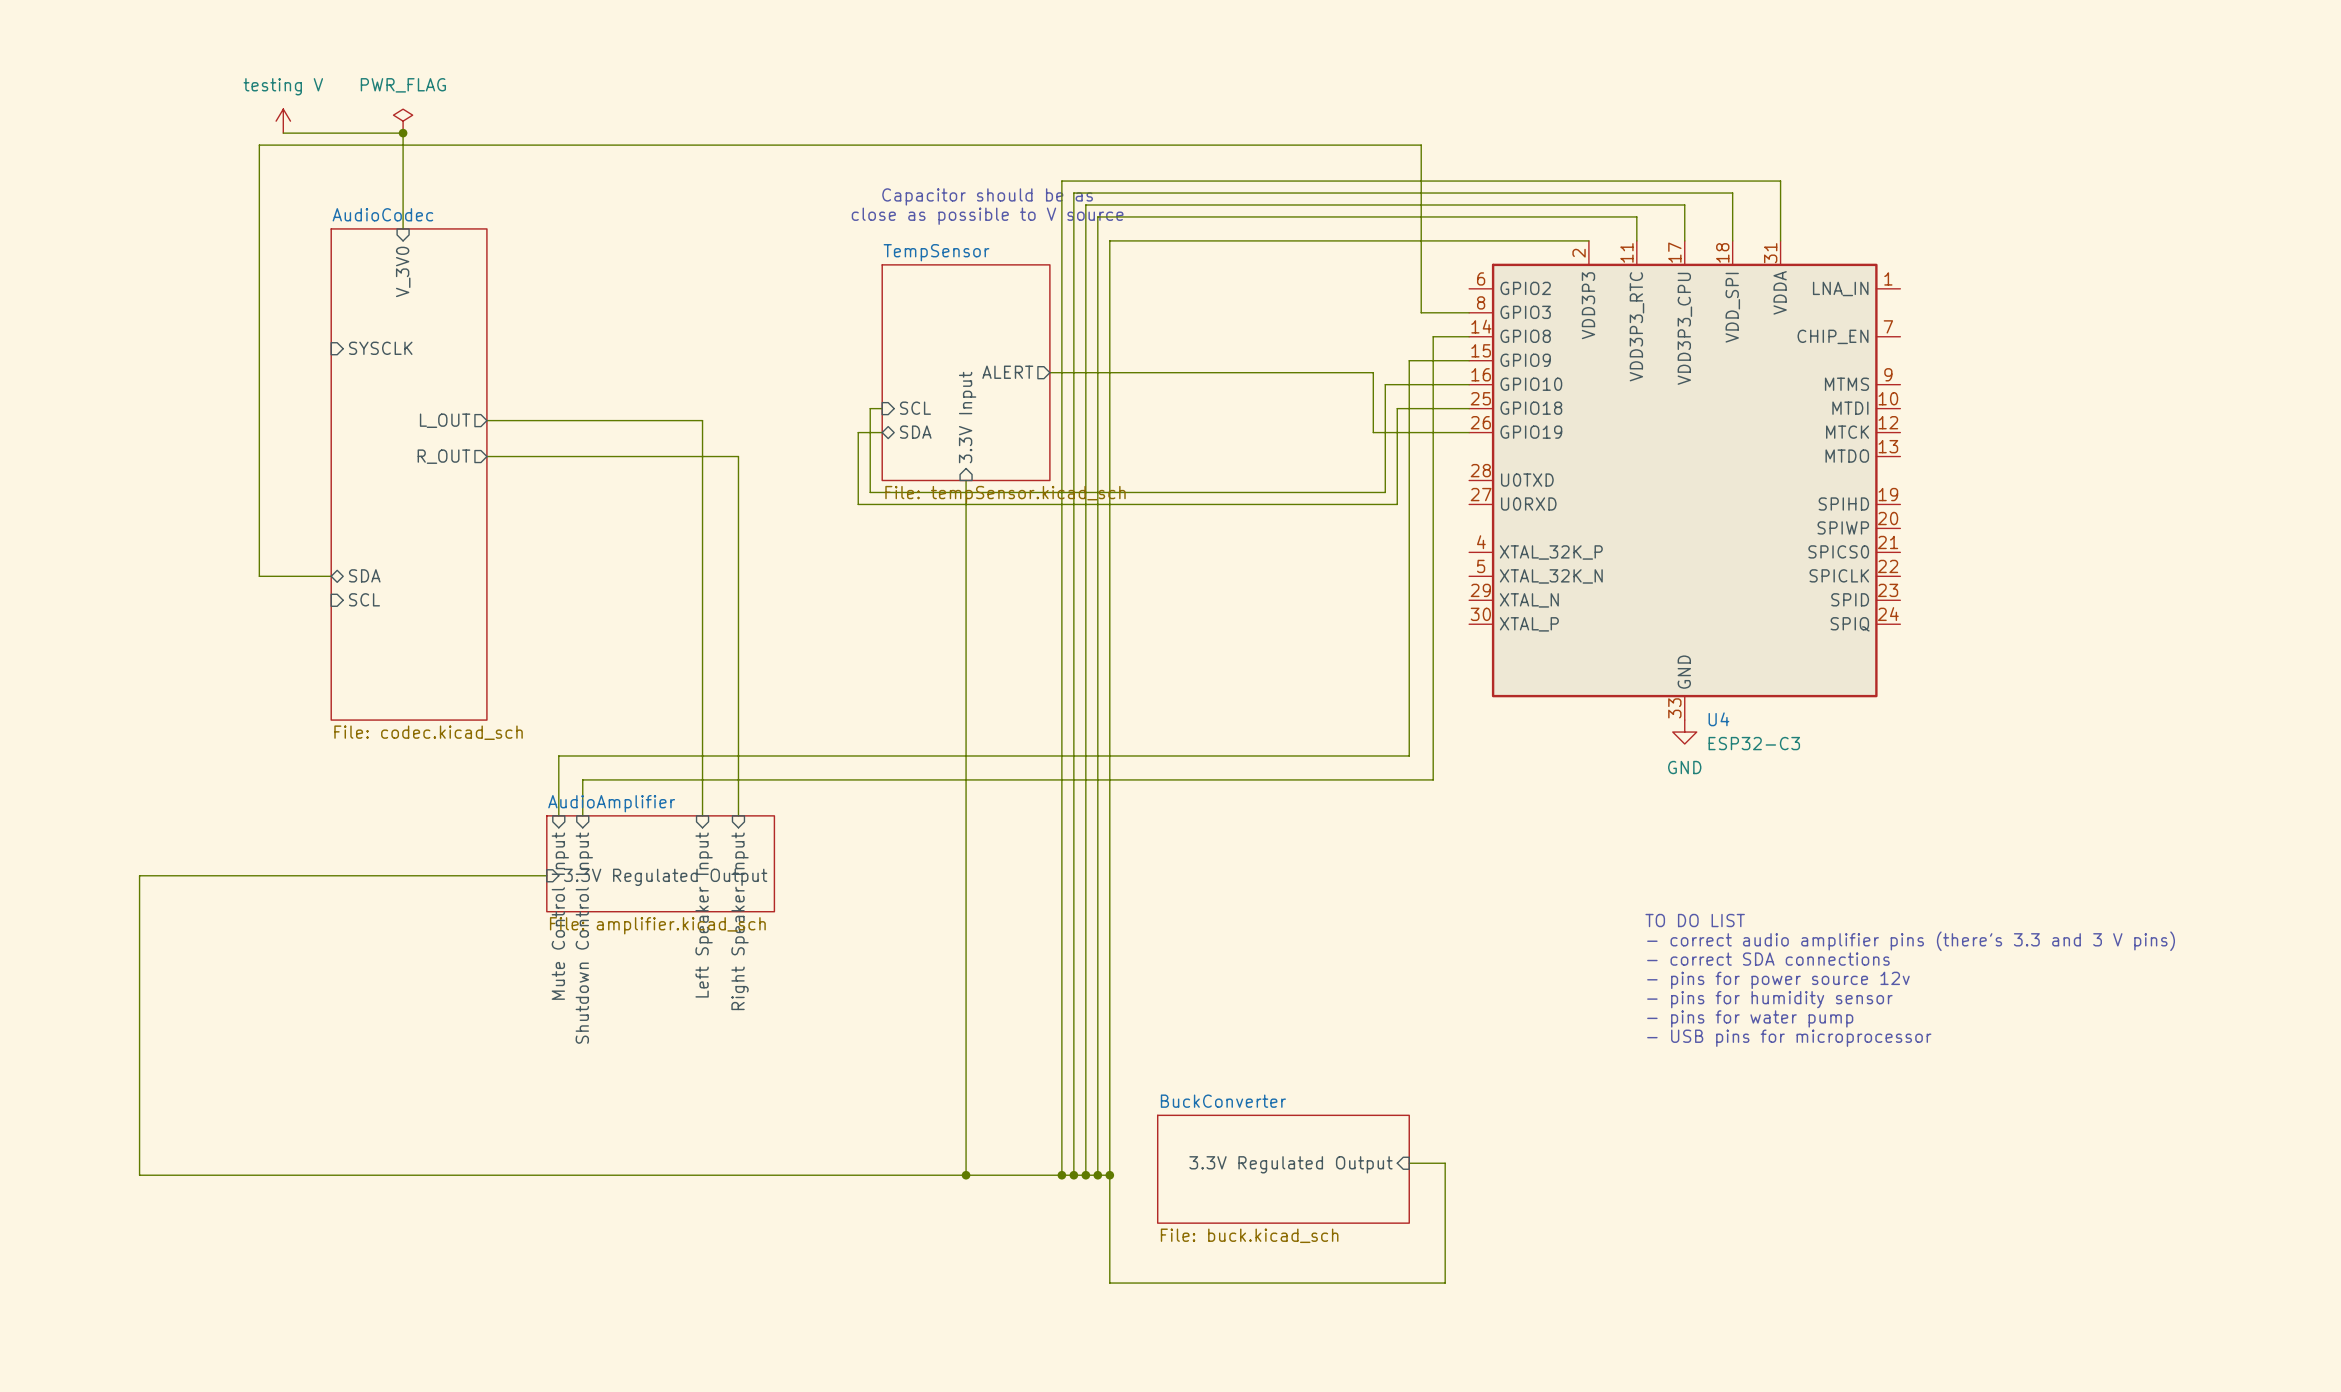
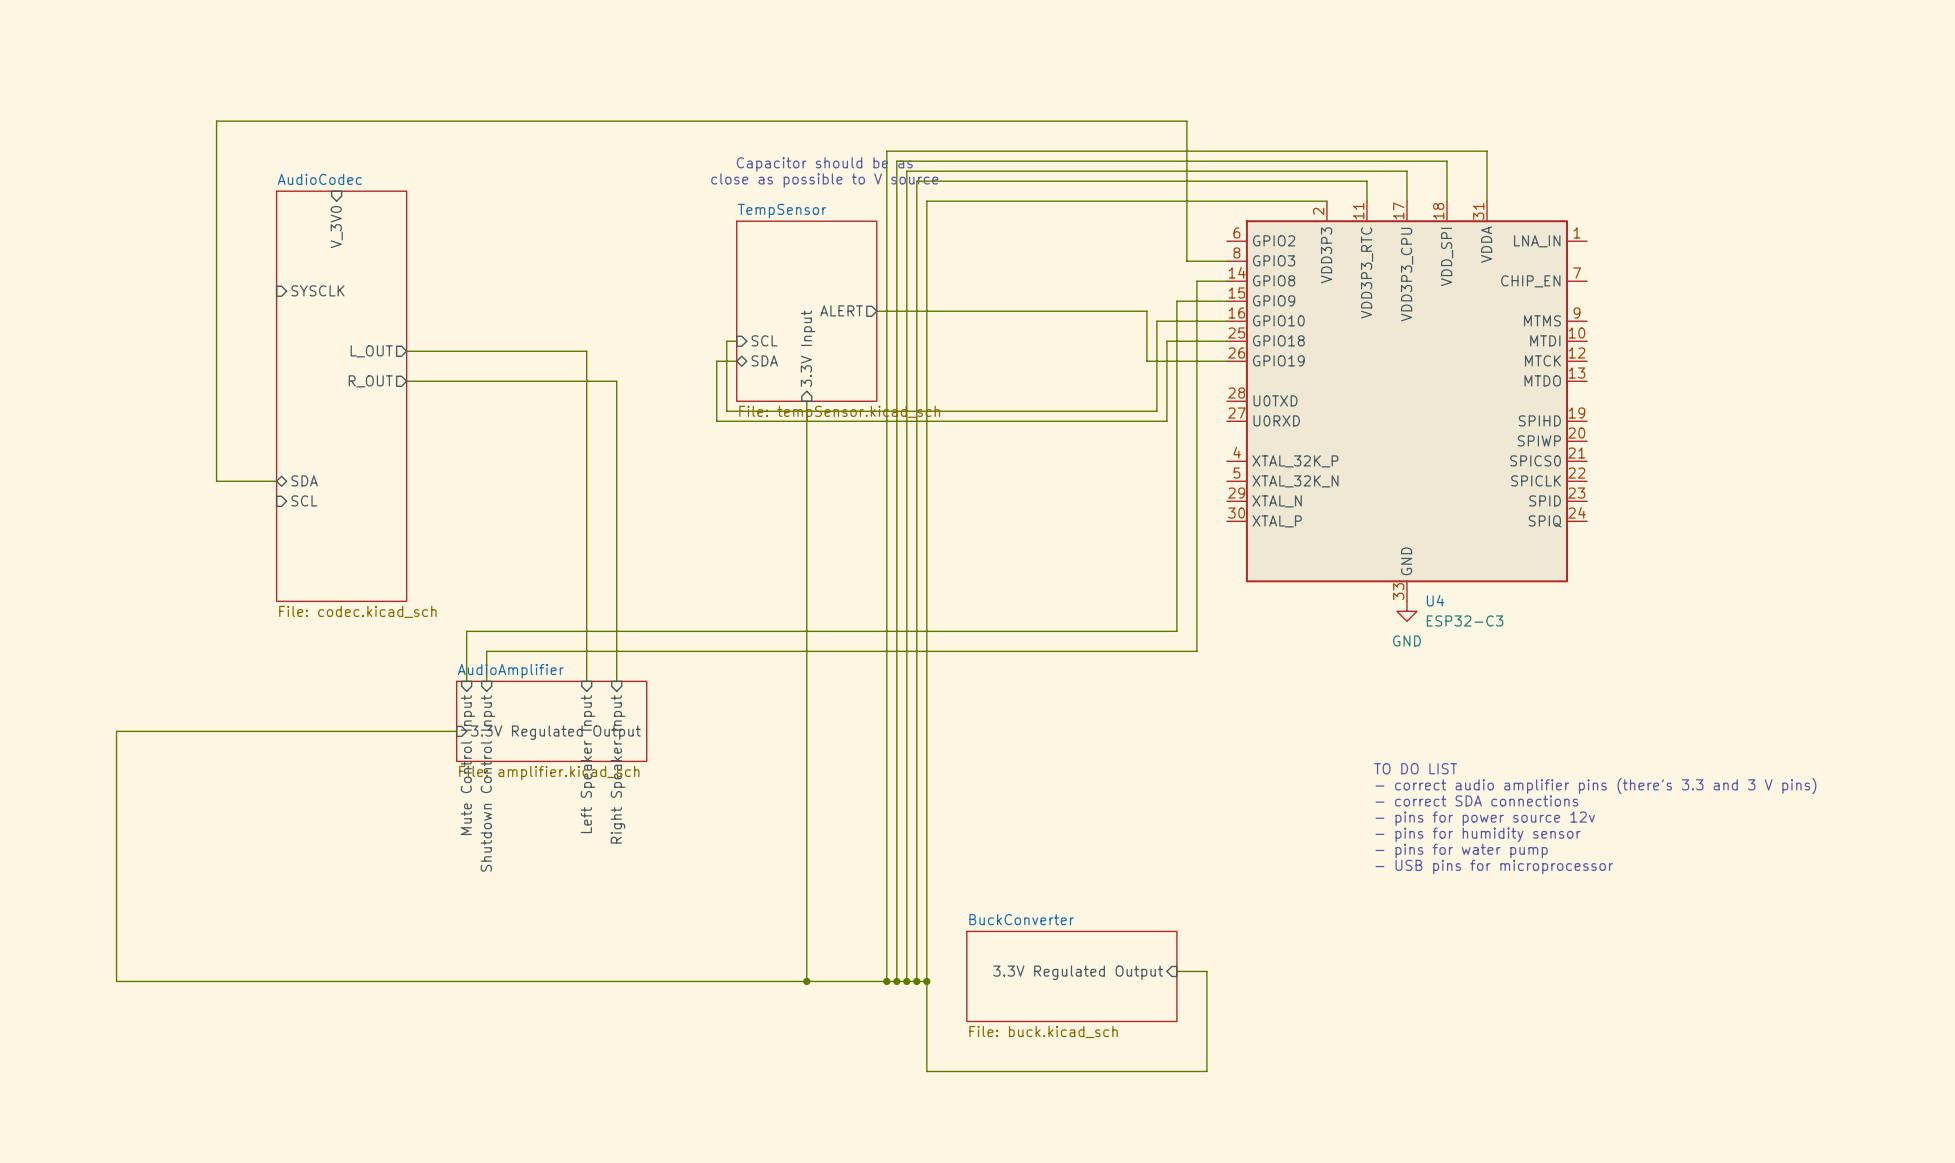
power symbol: testing V (283, 121) -> none
power symbol: PWR_FLAG (403, 121) -> none
wire: (283, 133) (403, 133) (403, 228) -> none
junction: (403, 133) -> none

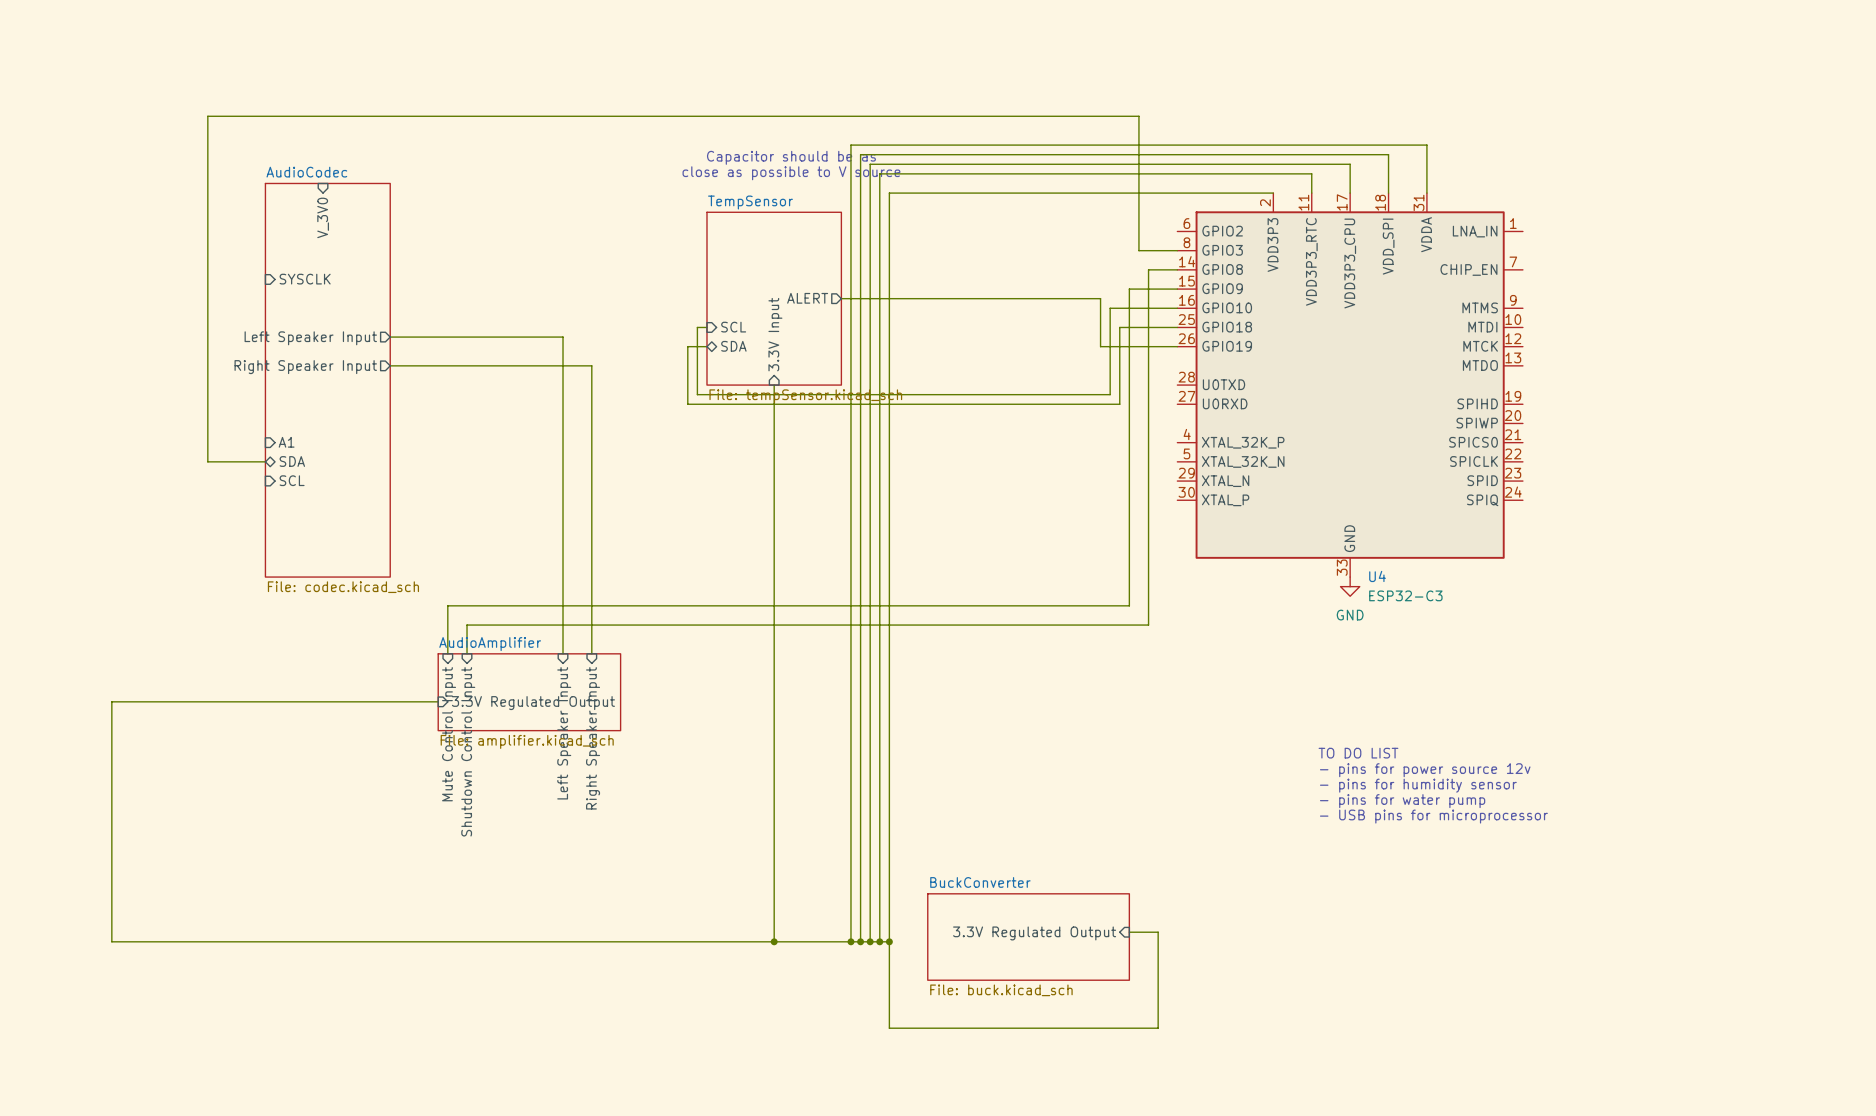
sheet pin: L_OUT (371, 351) -> Left Speaker Input (310, 338)
sheet pin: R_OUT (370, 381) -> Right Speaker Input (305, 367)
sheet pin: none -> A1 (286, 442)
text: TO DO LIST (1415, 768) -> none
text: - correct audio amplifier pins (there's 3.3 and 3 V pins) (1595, 786) -> TO DO LIST (1358, 753)
text: - correct SDA connections (1476, 800) -> - pins for power source 12v (1425, 770)
text: - pins for power source 12v (1485, 818) -> - pins for humidity sensor (1418, 785)
text: - pins for humidity sensor (1478, 834) -> - pins for water pump (1402, 801)
text: - pins for water pump (1461, 850) -> - USB pins for microprocessor (1433, 816)
text: - USB pins for microprocessor (1494, 867) -> none

